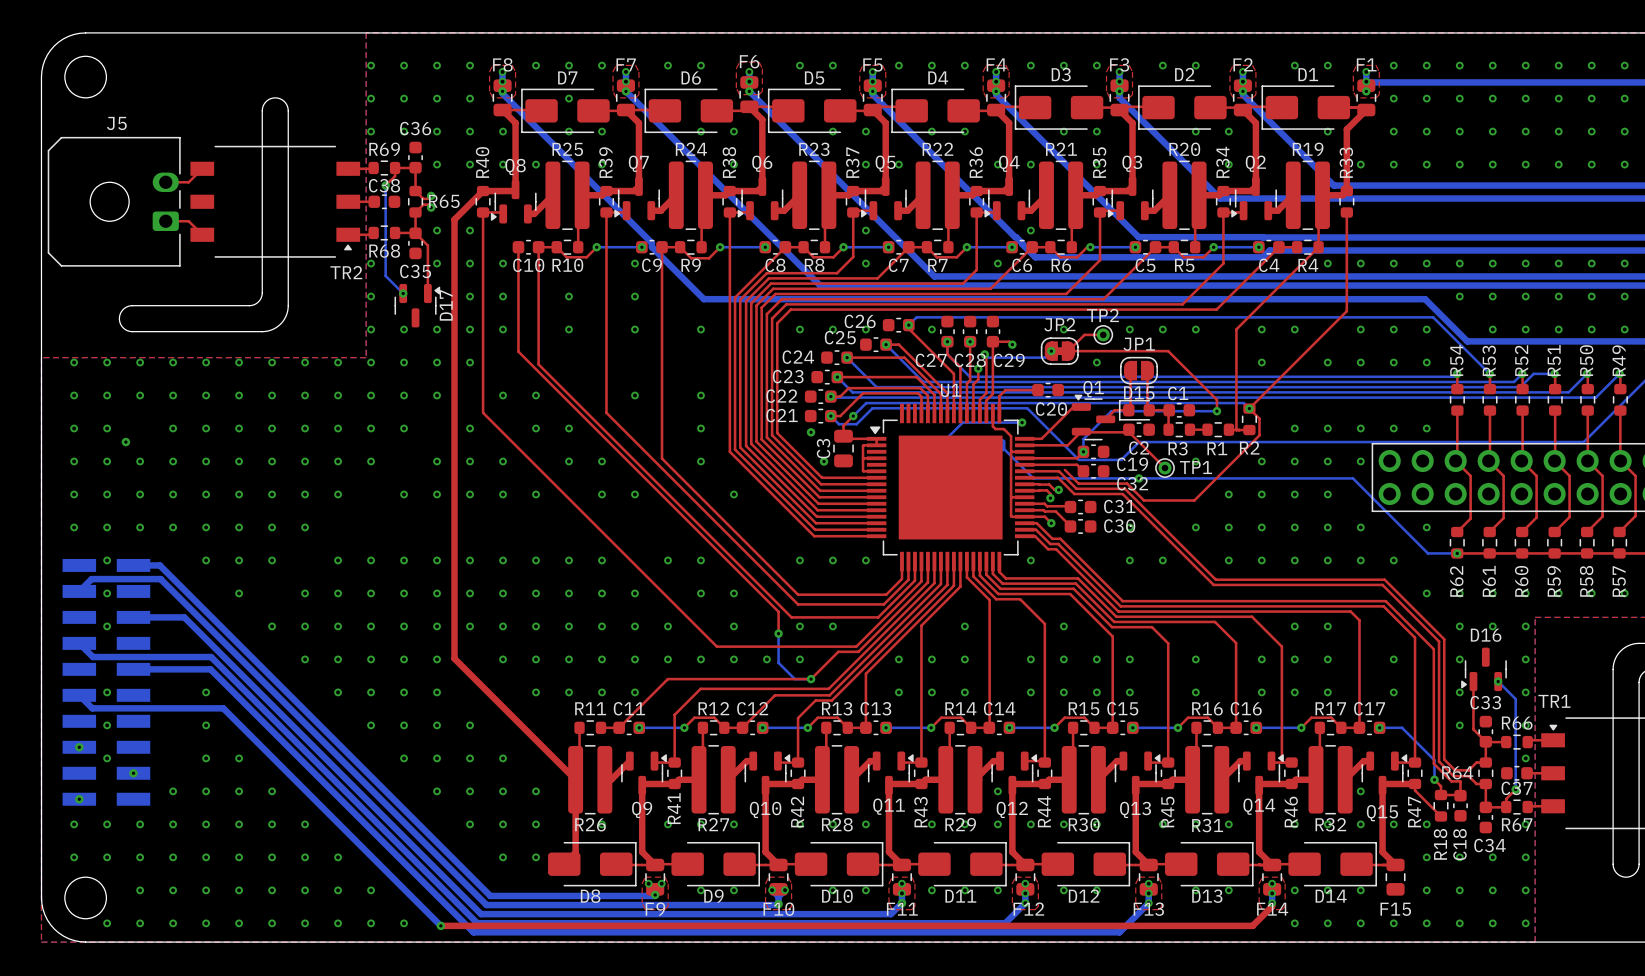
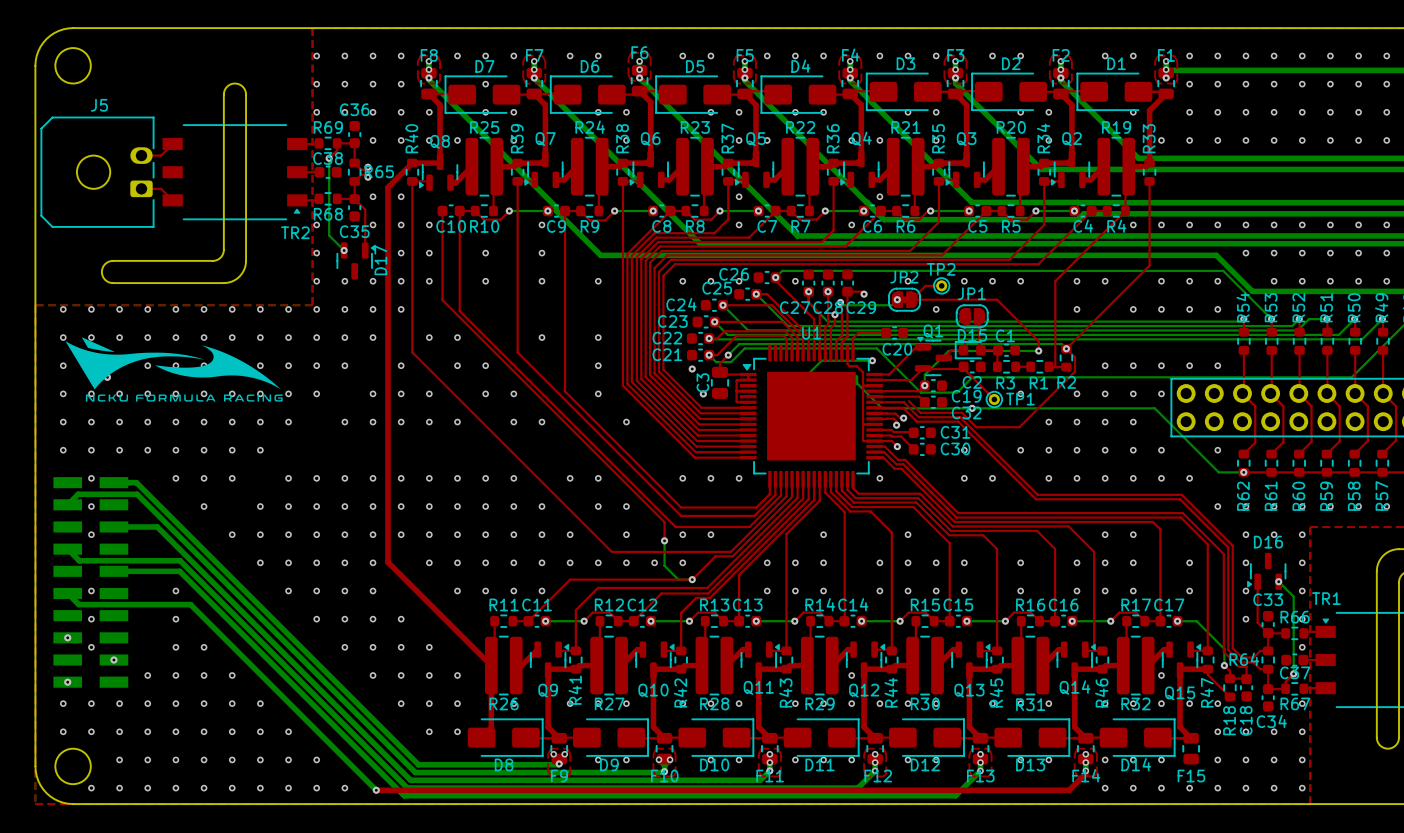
drawing: none -> [65, 337, 283, 402]

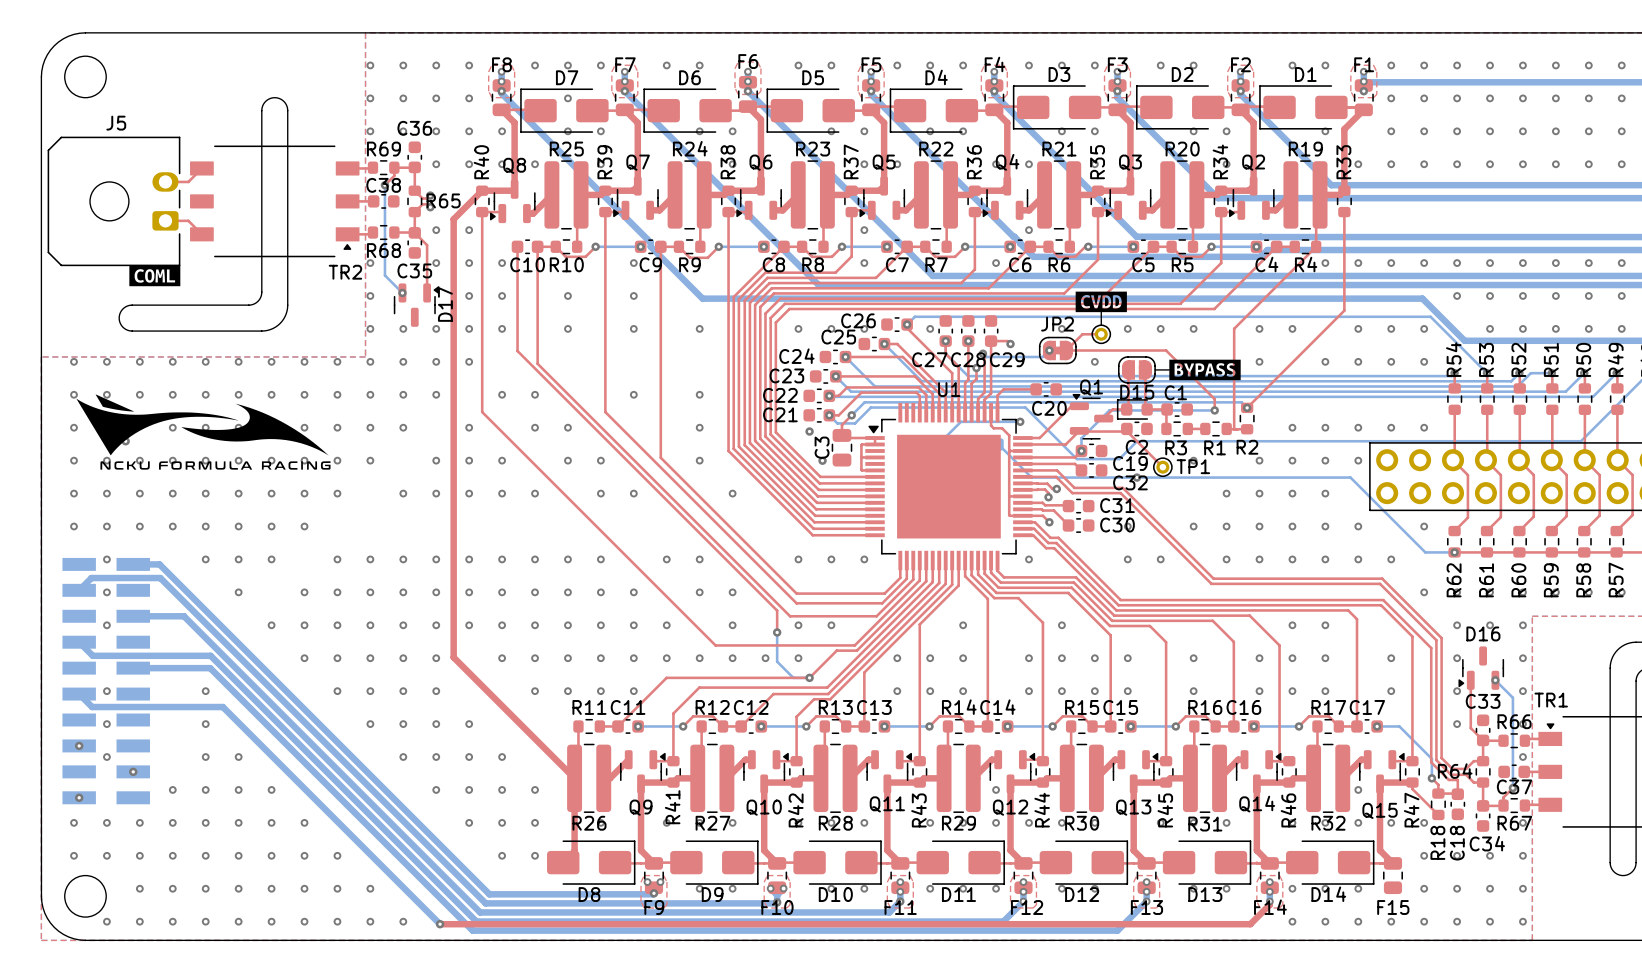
drawing: none -> [129, 265, 181, 287]
drawing: none -> [1075, 291, 1127, 313]
line: none -> (1101, 311) (1101, 325)
TP2 name: TP2 (941, 269) -> none
JP1 name: JP1 (971, 293) -> none
drawing: none -> [1169, 359, 1241, 381]
line: none -> (1155, 369) (1169, 369)
top track: (1066, 348) (1075, 357) (1075, 371) (1019, 427) (976, 427) (962, 412) (920, 412) (909, 401) -> none

